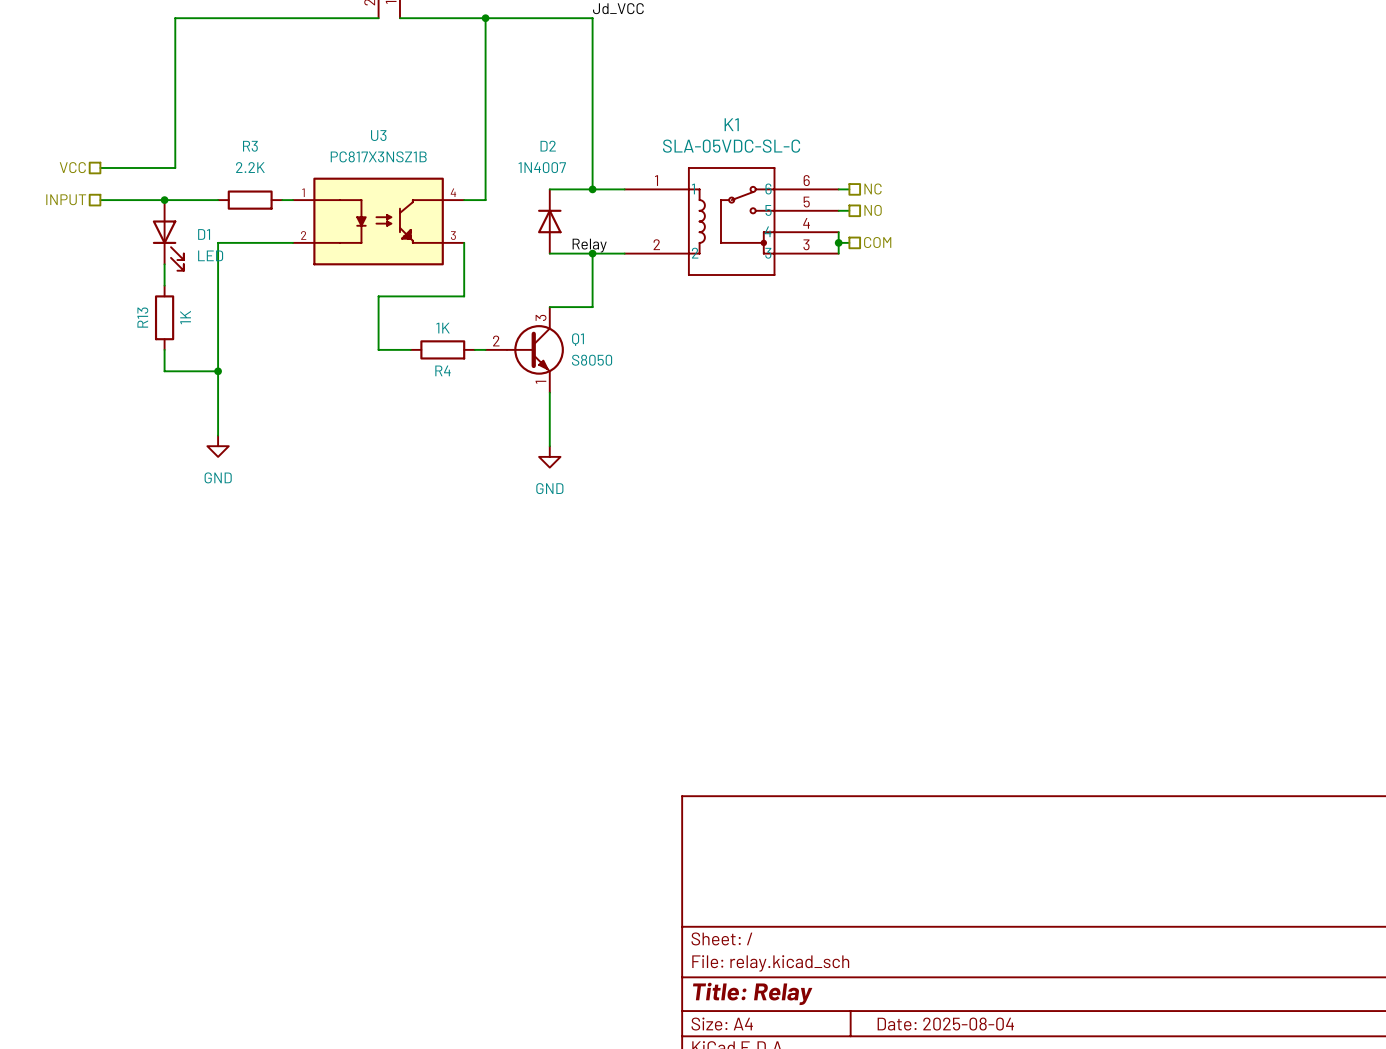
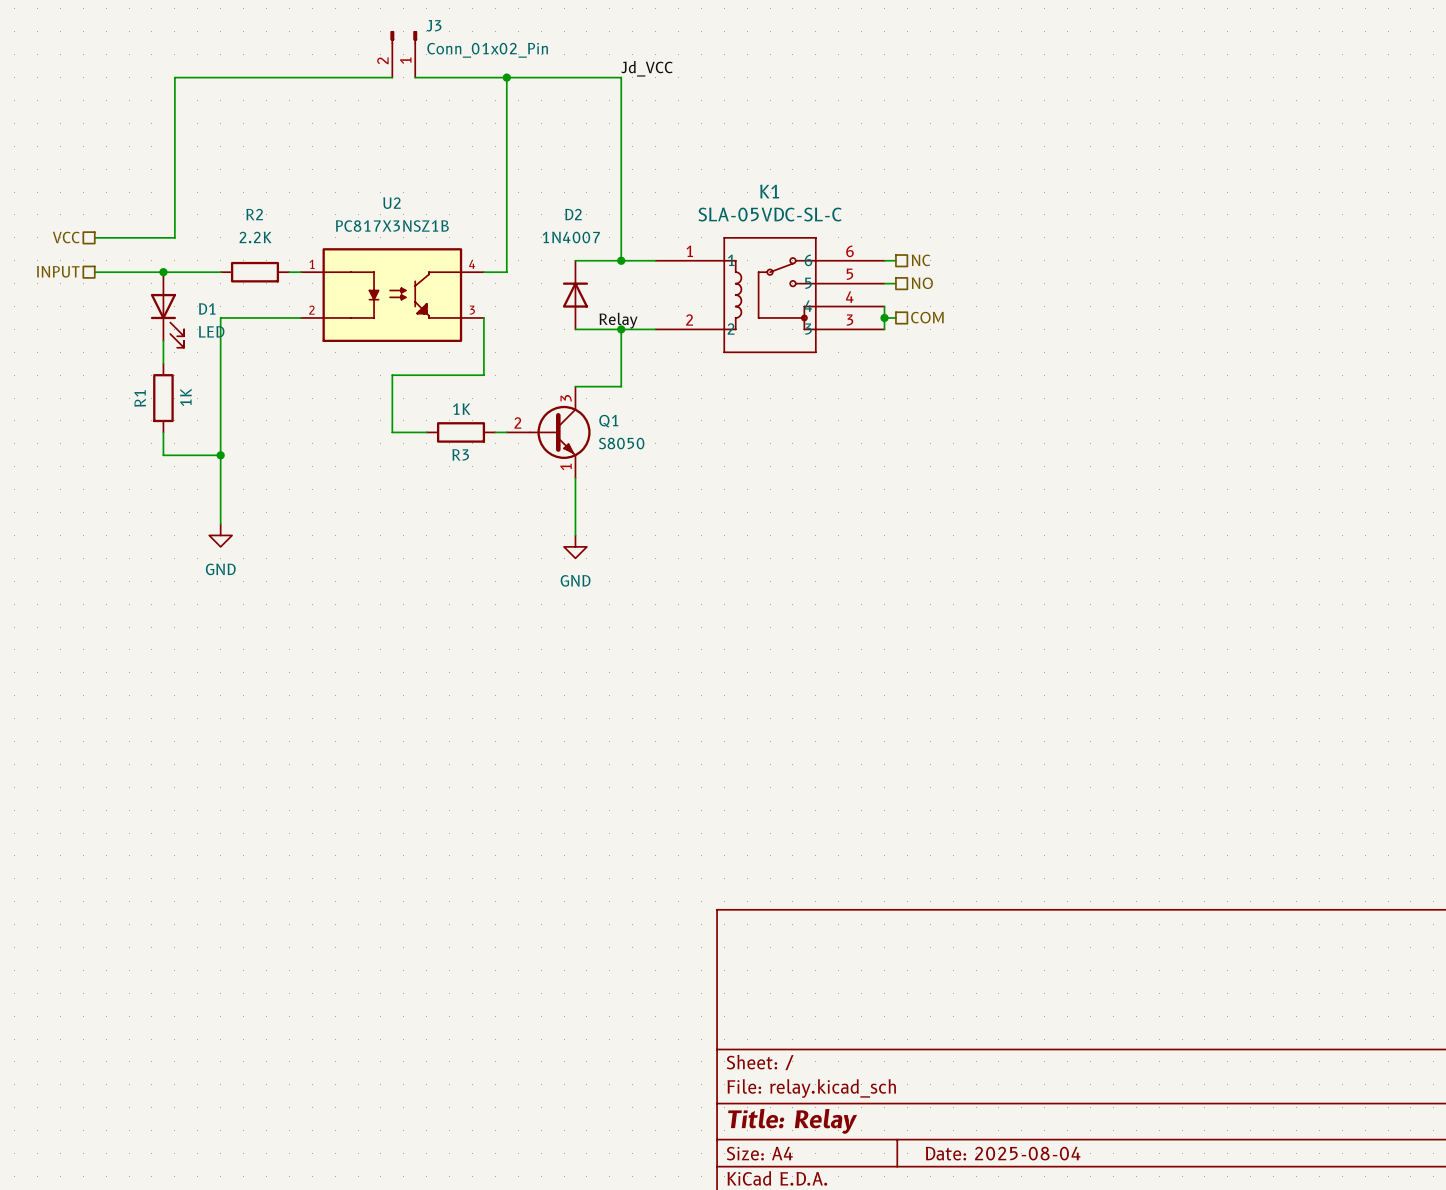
U3 name: U3 (378, 135) -> U2 (391, 203)
R3 name: R3 (250, 146) -> R2 (254, 214)
R13 name: R13 (142, 317) -> R1 (140, 398)
R4 name: R4 (443, 370) -> R3 (460, 454)

